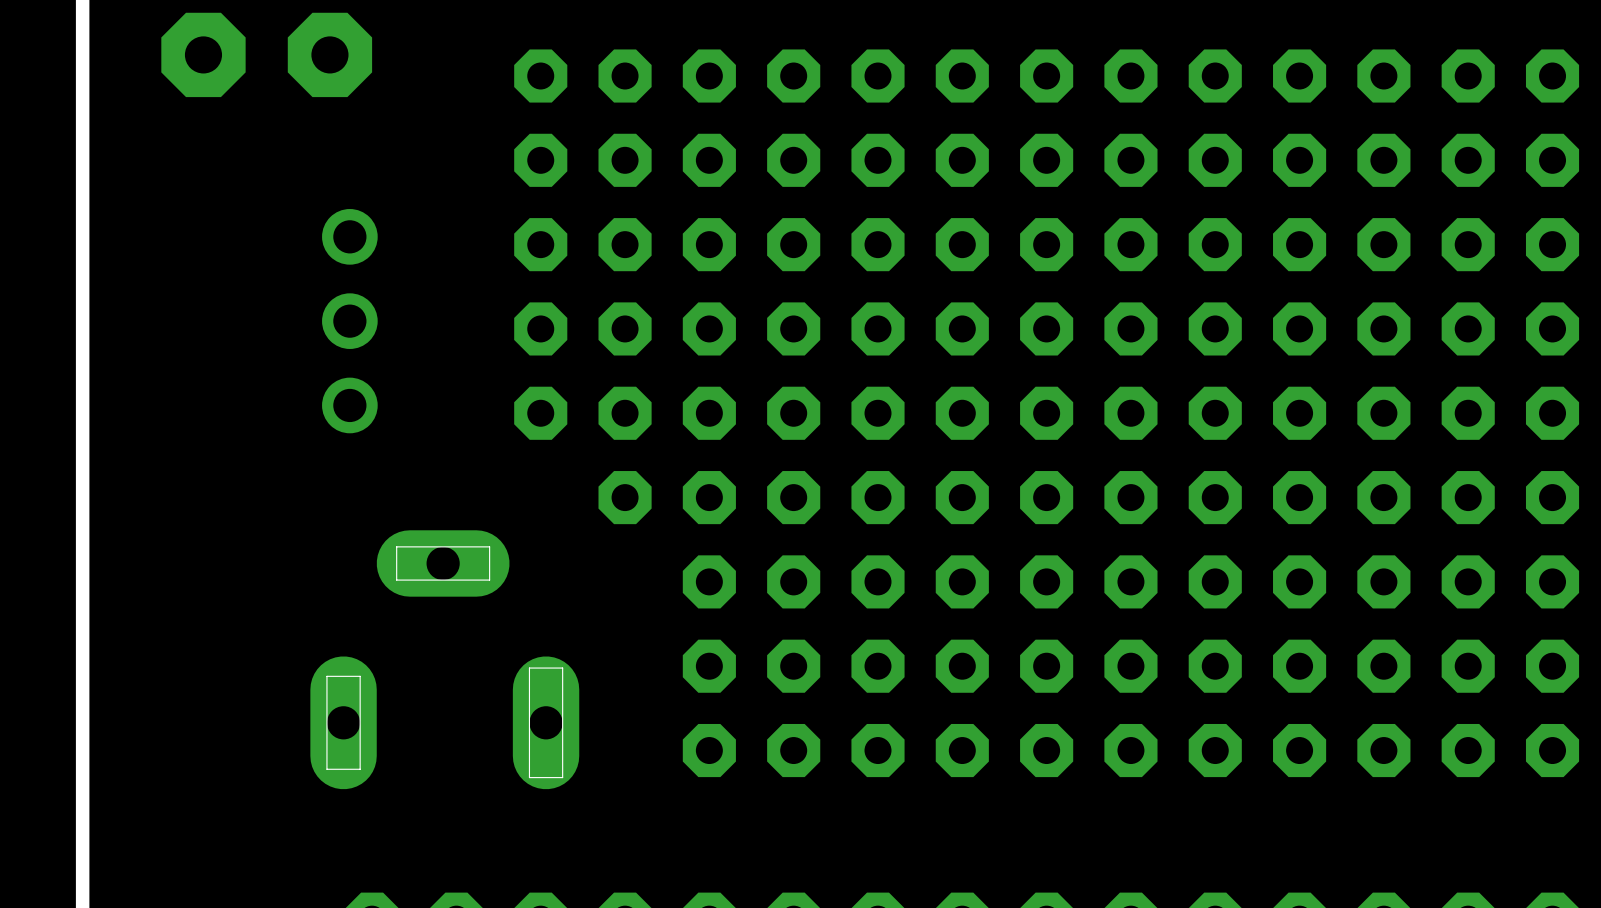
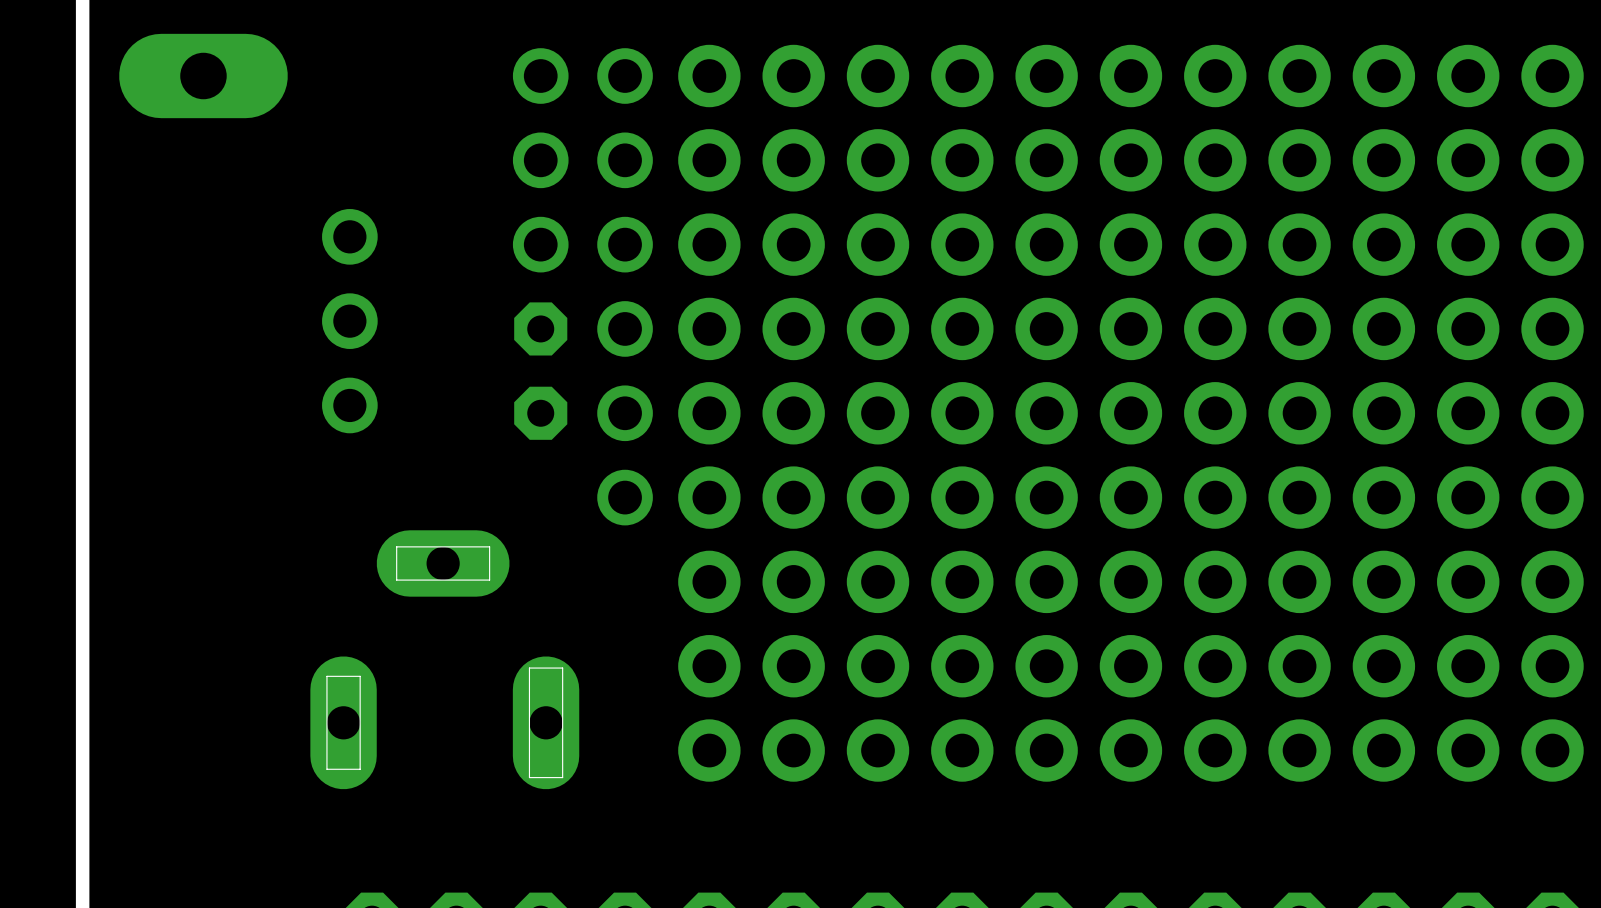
part footprint: [161, 12, 246, 98] -> [119, 33, 288, 119]
part: (329, 54) -> none
part: (540, 76) -> none
part: (625, 76) -> none
part: (709, 76) -> none
part: (793, 76) -> none
part: (878, 76) -> none
part: (962, 76) -> none
part: (1046, 76) -> none
part: (1130, 76) -> none
part: (1215, 76) -> none
part: (1299, 76) -> none
part: (1383, 76) -> none
part: (1468, 76) -> none
part: (1552, 76) -> none
part footprint: [514, 133, 568, 187] -> [512, 48, 569, 273]
part footprint: [598, 133, 652, 187] -> [597, 48, 653, 273]
part: (709, 160) -> none
part: (793, 160) -> none
part: (878, 160) -> none
part: (962, 160) -> none
part: (1046, 160) -> none
part: (1130, 160) -> none
part: (1215, 160) -> none
part: (1299, 160) -> none
part: (1383, 160) -> none
part: (1468, 160) -> none
part: (1552, 160) -> none
part: (540, 244) -> none
part: (625, 244) -> none
part: (709, 244) -> none
part: (793, 244) -> none
part: (878, 244) -> none
part: (962, 244) -> none
part: (1046, 244) -> none
part: (1130, 244) -> none
part: (1215, 244) -> none
part: (1299, 244) -> none
part: (1383, 244) -> none
part: (1468, 244) -> none
part: (1552, 244) -> none
part: (625, 328) -> none
part: (709, 328) -> none
part: (793, 328) -> none
part: (878, 328) -> none
part: (962, 328) -> none
part: (1046, 328) -> none
part: (1130, 328) -> none
part: (1215, 328) -> none
part: (1299, 328) -> none
part: (1383, 328) -> none
part: (1468, 328) -> none
part: (1552, 328) -> none
part footprint: [598, 386, 652, 440] -> [597, 301, 653, 526]
part footprint: [682, 386, 736, 440] -> [678, 44, 741, 782]
part footprint: [767, 386, 821, 440] -> [762, 44, 825, 782]
part footprint: [851, 386, 905, 440] -> [846, 44, 910, 782]
part footprint: [935, 386, 989, 440] -> [931, 44, 994, 782]
part footprint: [1020, 386, 1074, 440] -> [1015, 44, 1078, 782]
part footprint: [1104, 386, 1158, 440] -> [1099, 44, 1163, 782]
part footprint: [1188, 386, 1242, 440] -> [1184, 44, 1247, 782]
part footprint: [1273, 386, 1327, 440] -> [1268, 44, 1331, 782]
part footprint: [1357, 386, 1411, 440] -> [1352, 44, 1416, 782]
part footprint: [1441, 386, 1495, 440] -> [1437, 44, 1500, 782]
part footprint: [1525, 386, 1580, 440] -> [1521, 44, 1584, 782]
part: (625, 497) -> none
part: (709, 497) -> none
part: (793, 497) -> none
part: (878, 497) -> none
part: (962, 497) -> none
part: (1046, 497) -> none
part: (1130, 497) -> none
part: (1215, 497) -> none
part: (1299, 497) -> none
part: (1383, 497) -> none
part: (1468, 497) -> none
part: (1552, 497) -> none
part: (709, 581) -> none
part: (793, 581) -> none
part: (878, 581) -> none
part: (962, 581) -> none
part: (1046, 581) -> none
part: (1130, 581) -> none
part: (1215, 581) -> none
part: (1299, 581) -> none
part: (1383, 581) -> none
part: (1468, 581) -> none
part: (1552, 581) -> none
part: (709, 666) -> none
part: (793, 666) -> none
part: (878, 666) -> none
part: (962, 666) -> none
part: (1046, 666) -> none
part: (1130, 666) -> none
part: (1215, 666) -> none
part: (1299, 666) -> none
part: (1383, 666) -> none
part: (1468, 666) -> none
part: (1552, 666) -> none
part: (709, 750) -> none
part: (793, 750) -> none
part: (878, 750) -> none
part: (962, 750) -> none
part: (1046, 750) -> none
part: (1130, 750) -> none
part: (1215, 750) -> none
part: (1299, 750) -> none
part: (1383, 750) -> none
part: (1468, 750) -> none
part: (1552, 750) -> none

